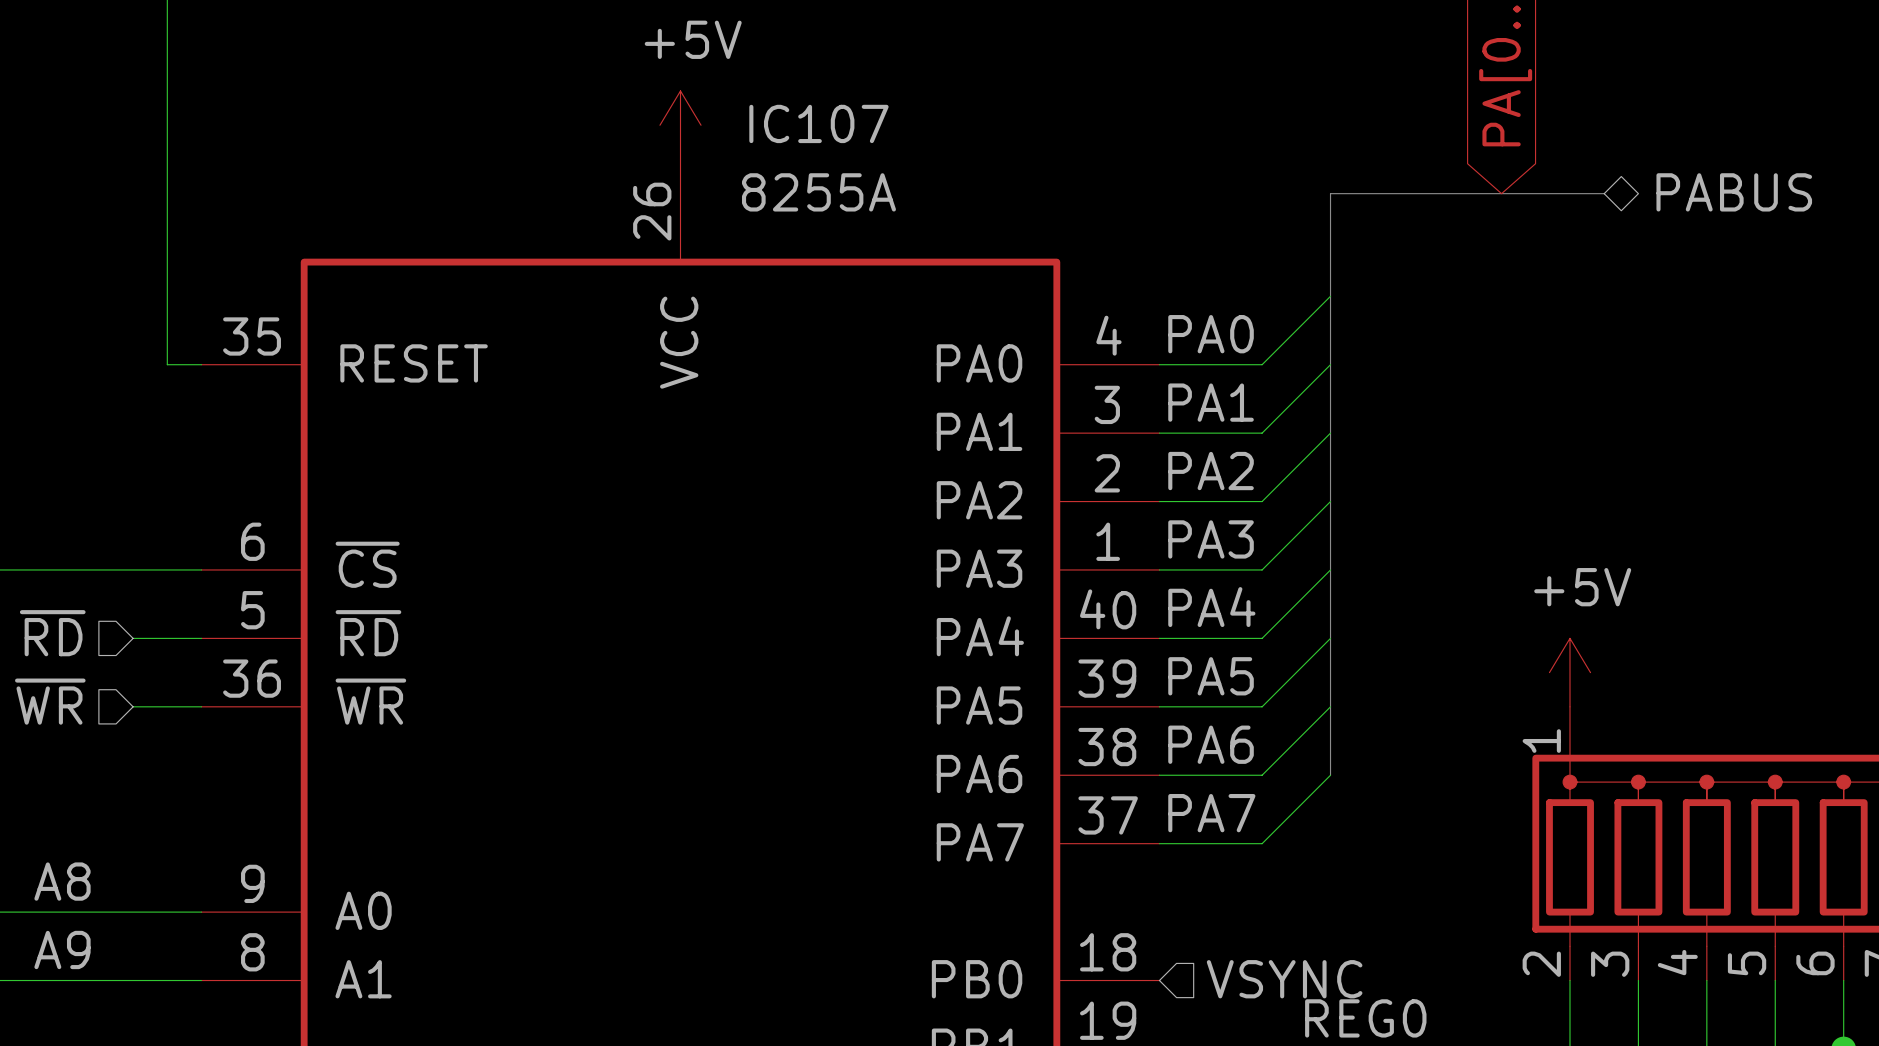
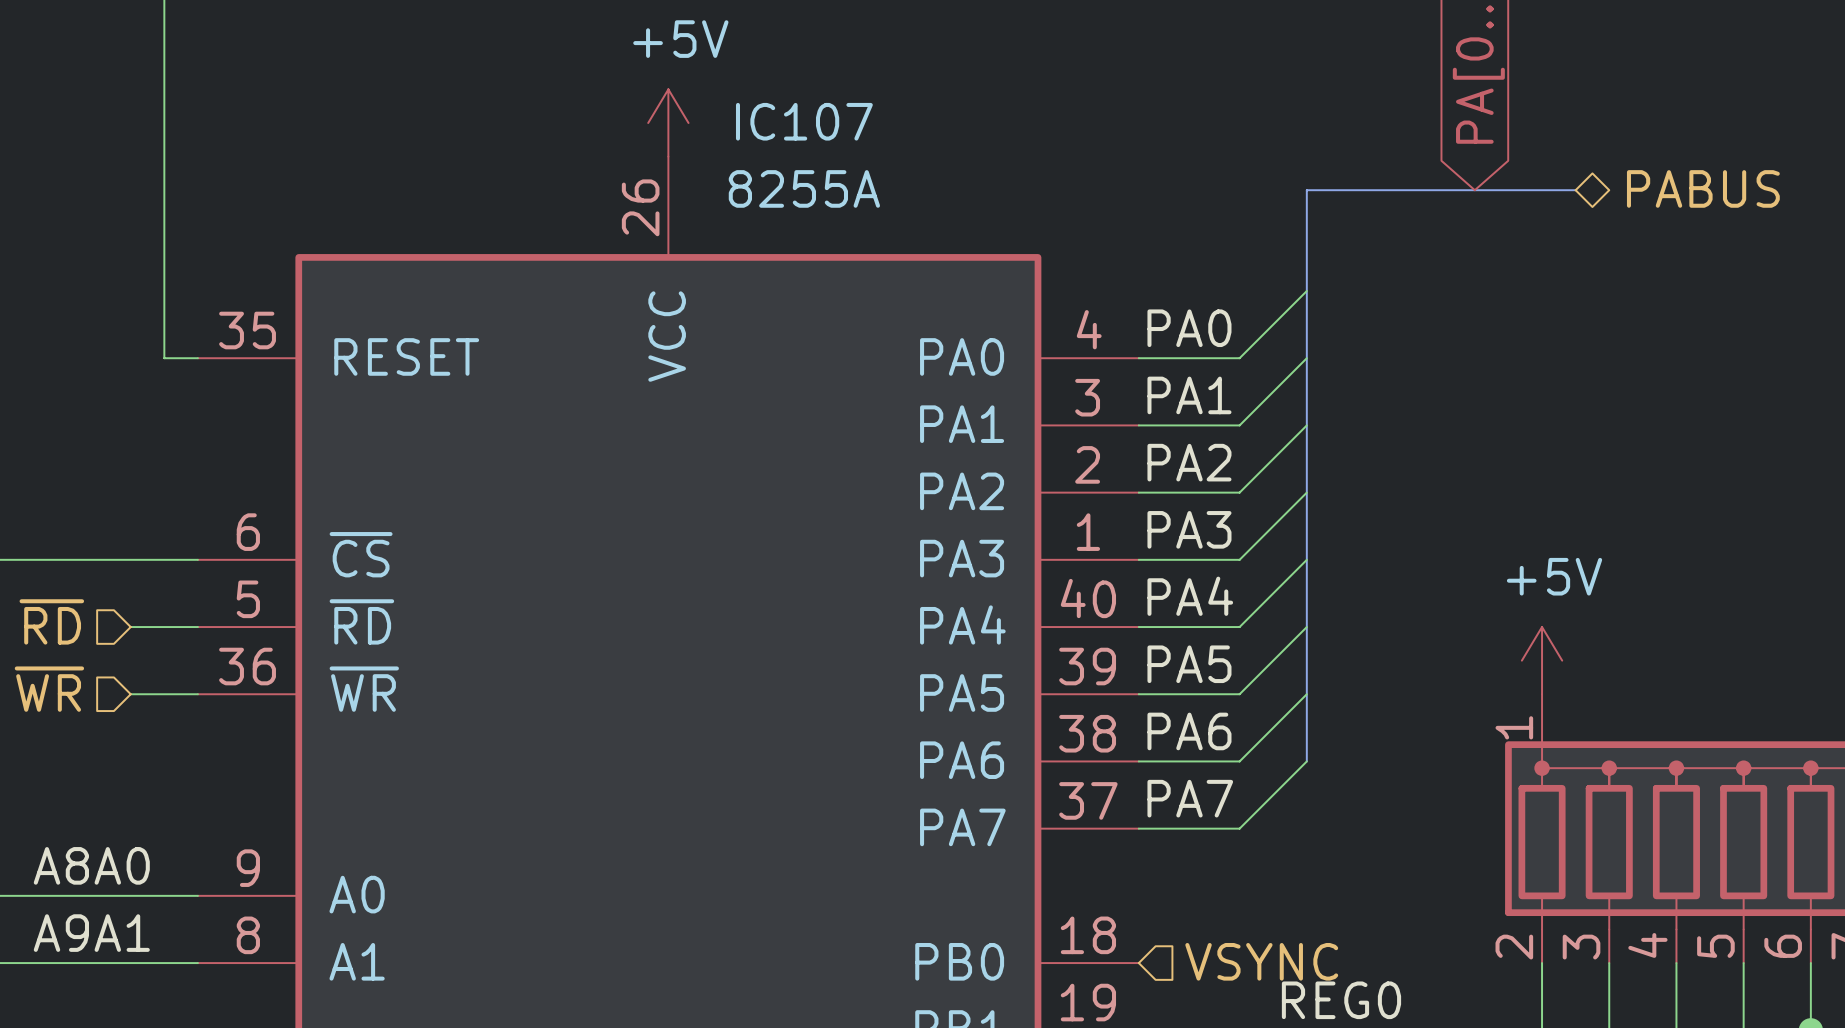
label: A8 (62, 881) -> A8A0 (91, 865)
label: A9 (62, 949) -> A9A1 (91, 933)

